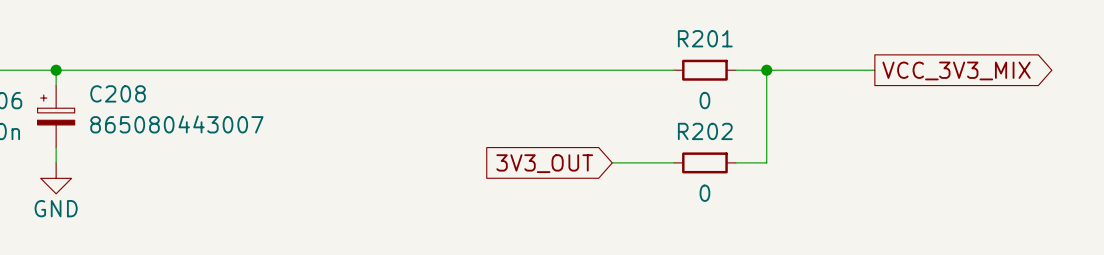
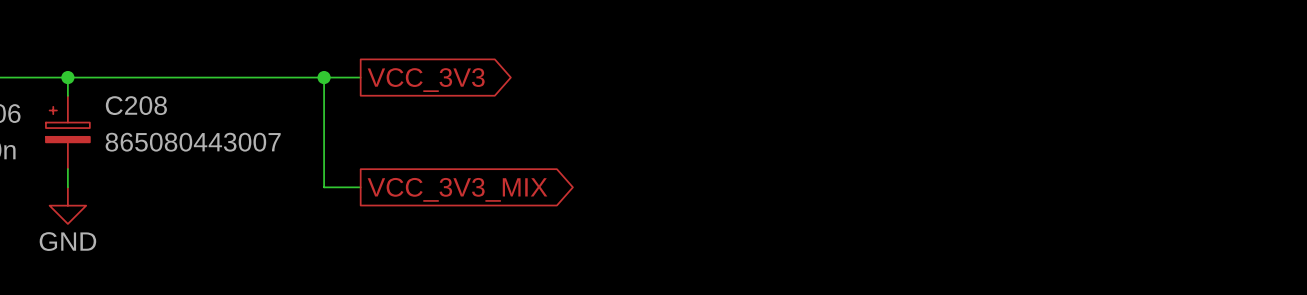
wire: none -> (324, 77) (324, 187) (360, 187)
junction: none -> (324, 77)
wire: (303, 70) (674, 70) -> none
global label: none -> VCC_3V3 (426, 80)
R201: 0 (704, 70) -> none
wire: (735, 70) (874, 70) -> none
wire: (766, 70) (766, 162) (735, 162) -> none
junction: (766, 70) -> none
global label: VCC_3V3_MIX (956, 70) -> none
wire: (612, 162) (674, 162) -> none
R202: 0 (704, 162) -> none
global label: none -> VCC_3V3_MIX (457, 189)
global label: 3V3_OUT (544, 163) -> none

